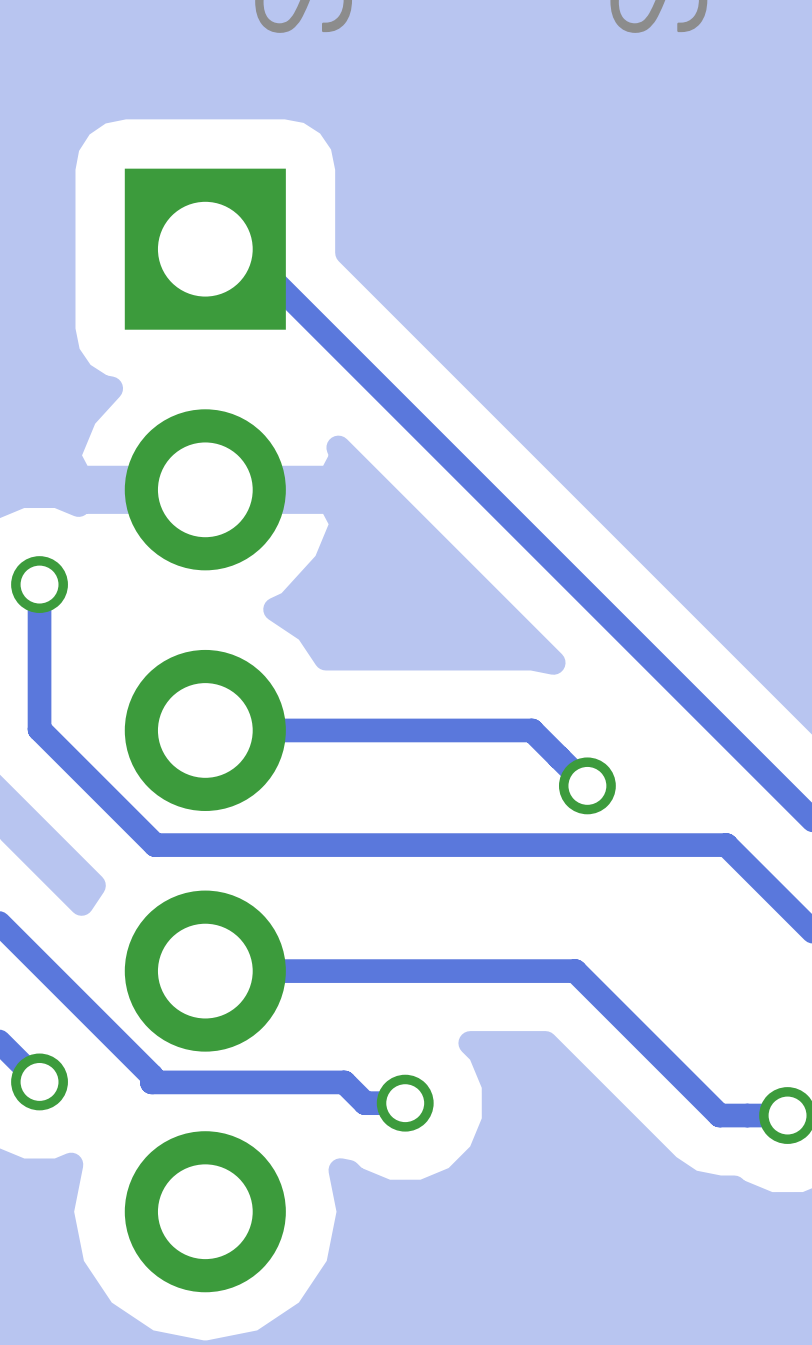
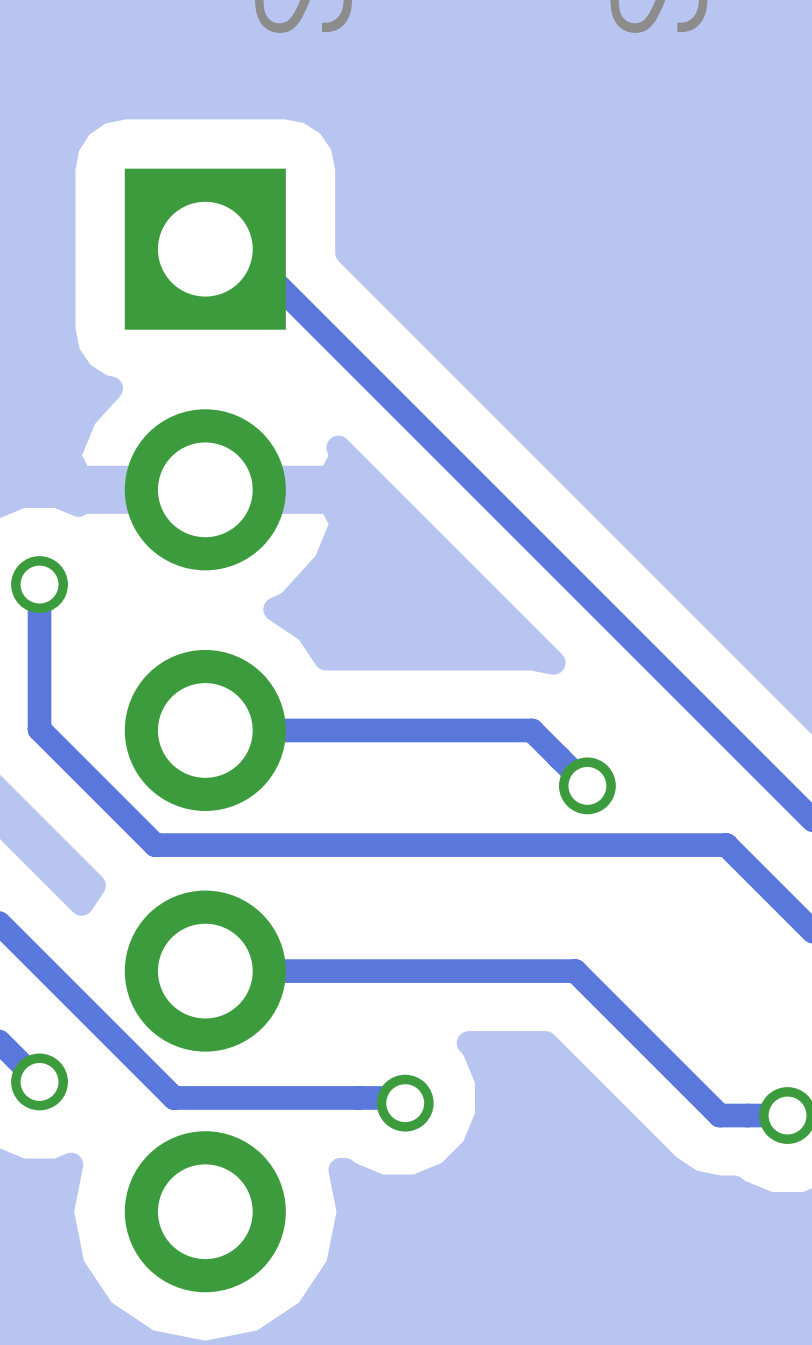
track: (151, 1075) (151, 1082) (344, 1082) (365, 1103) (405, 1103) -> (151, 1075) (173, 1097) (398, 1097)

